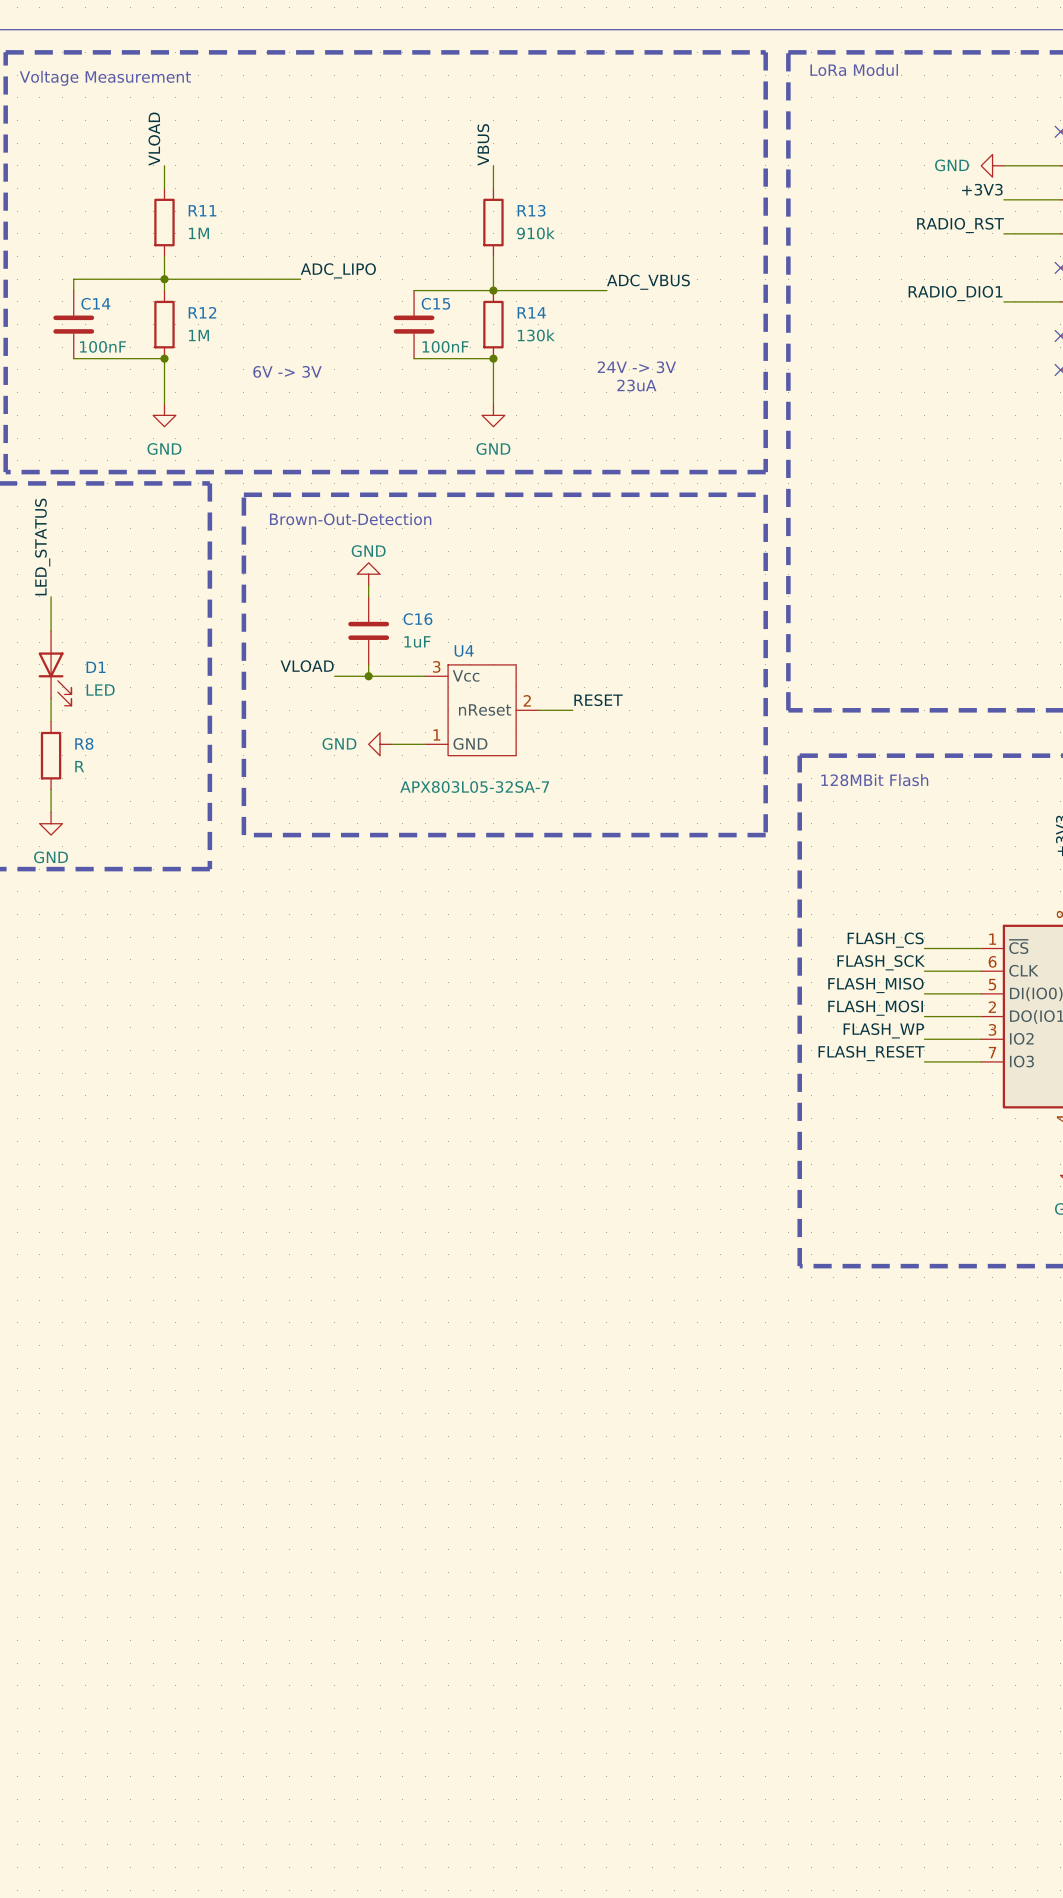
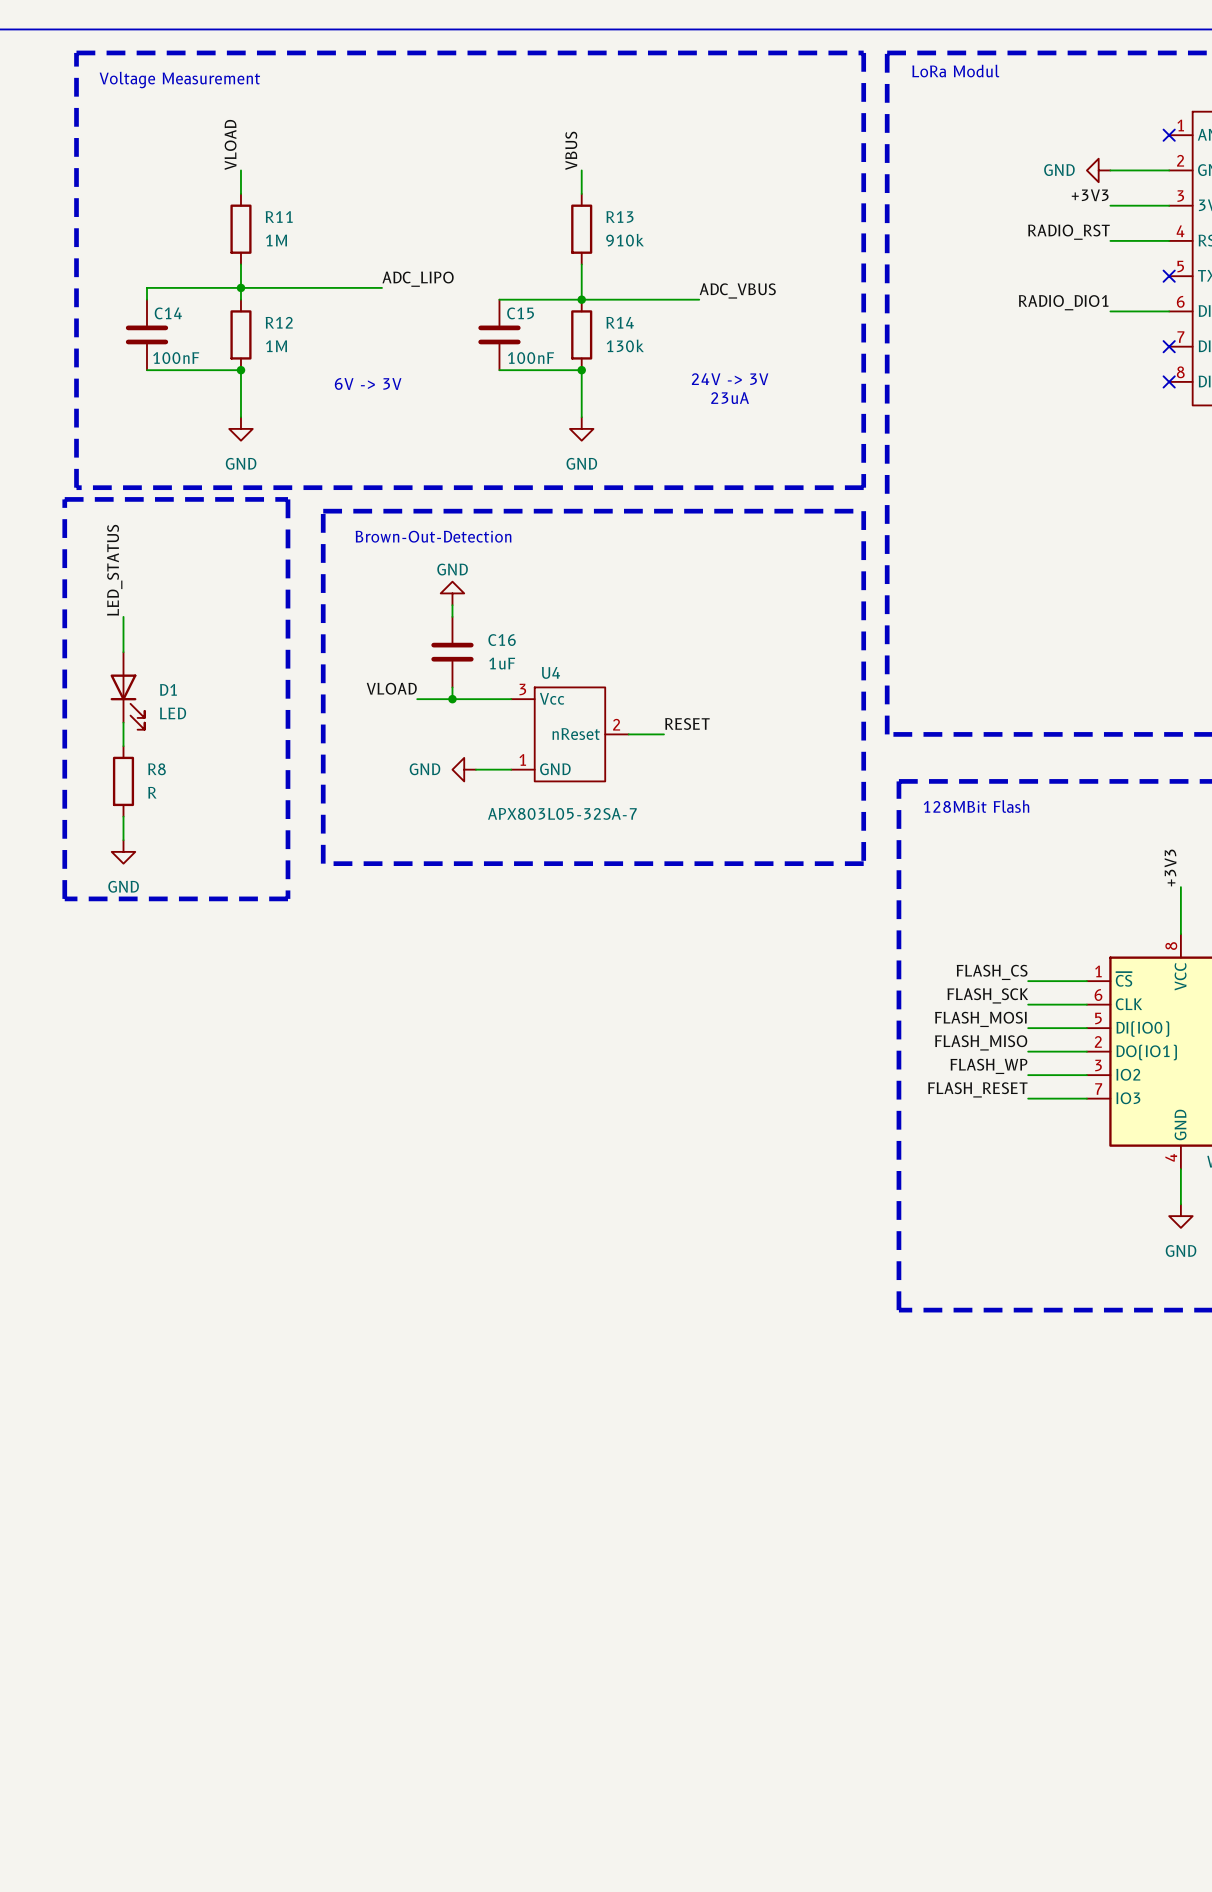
label: FLASH_MISO (875, 985) -> FLASH_MOSI (980, 1019)
label: FLASH_MOSI (875, 1008) -> FLASH_MISO (981, 1042)

